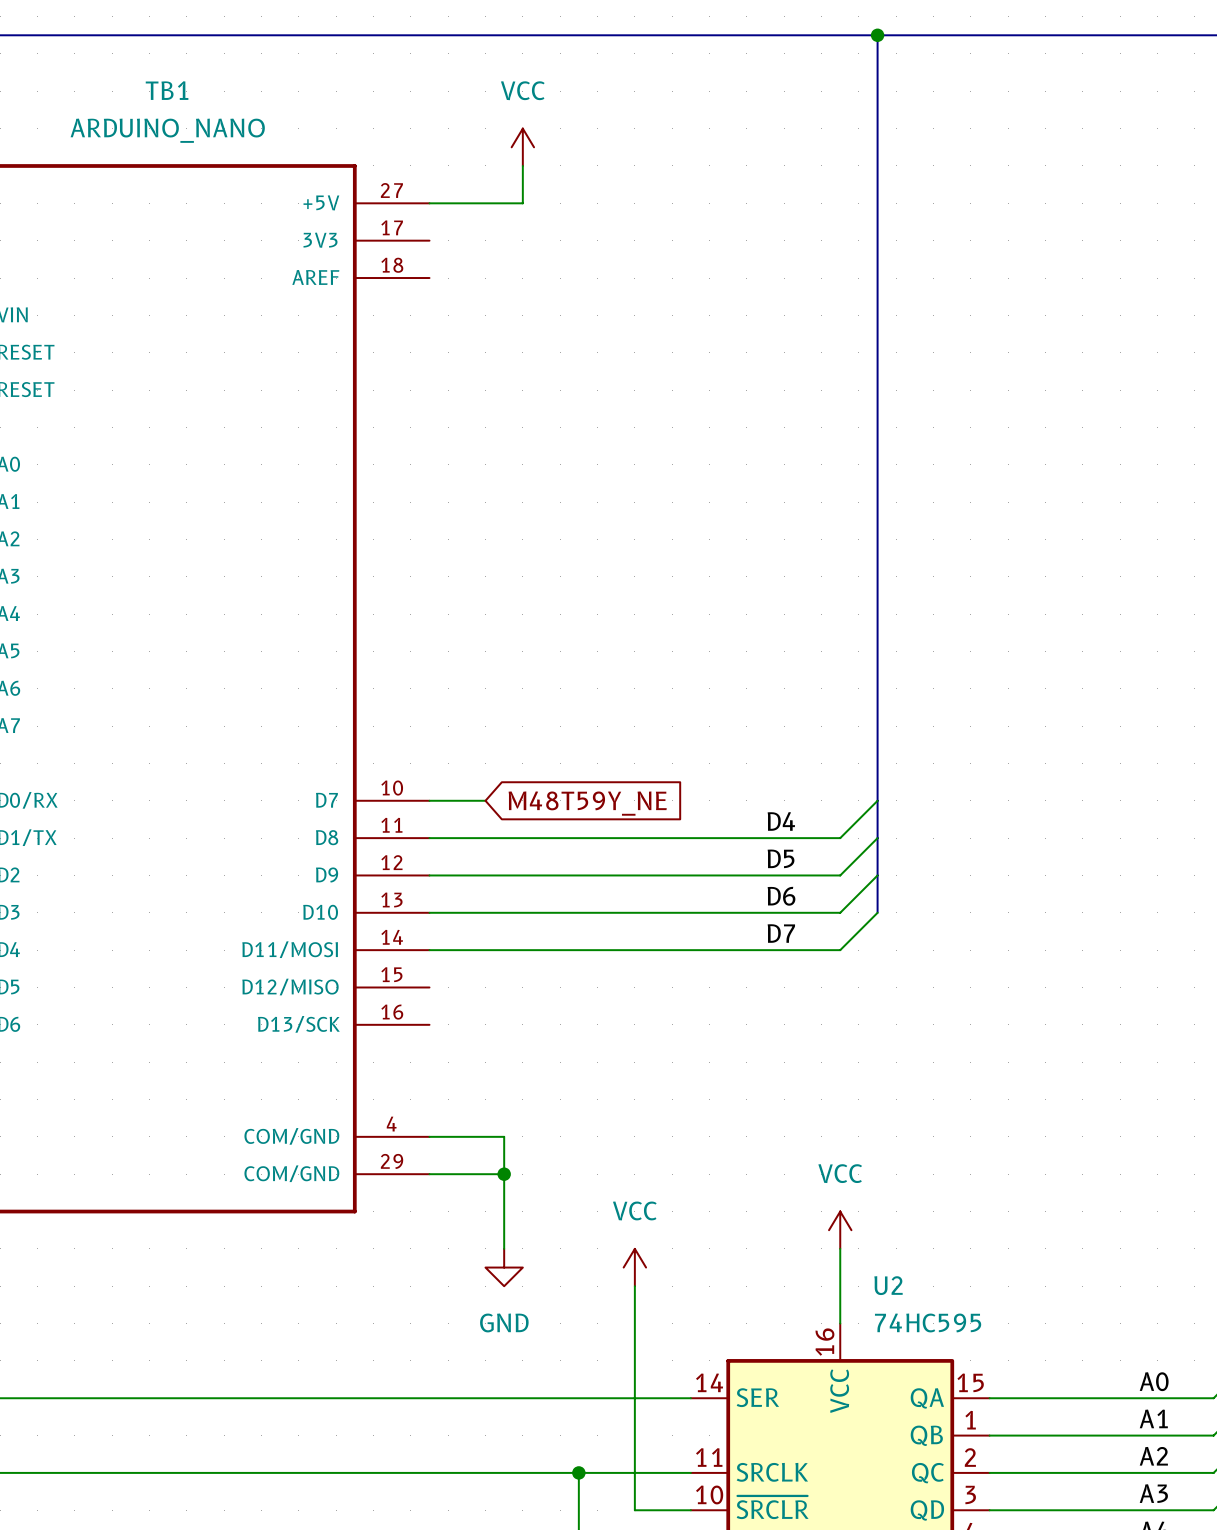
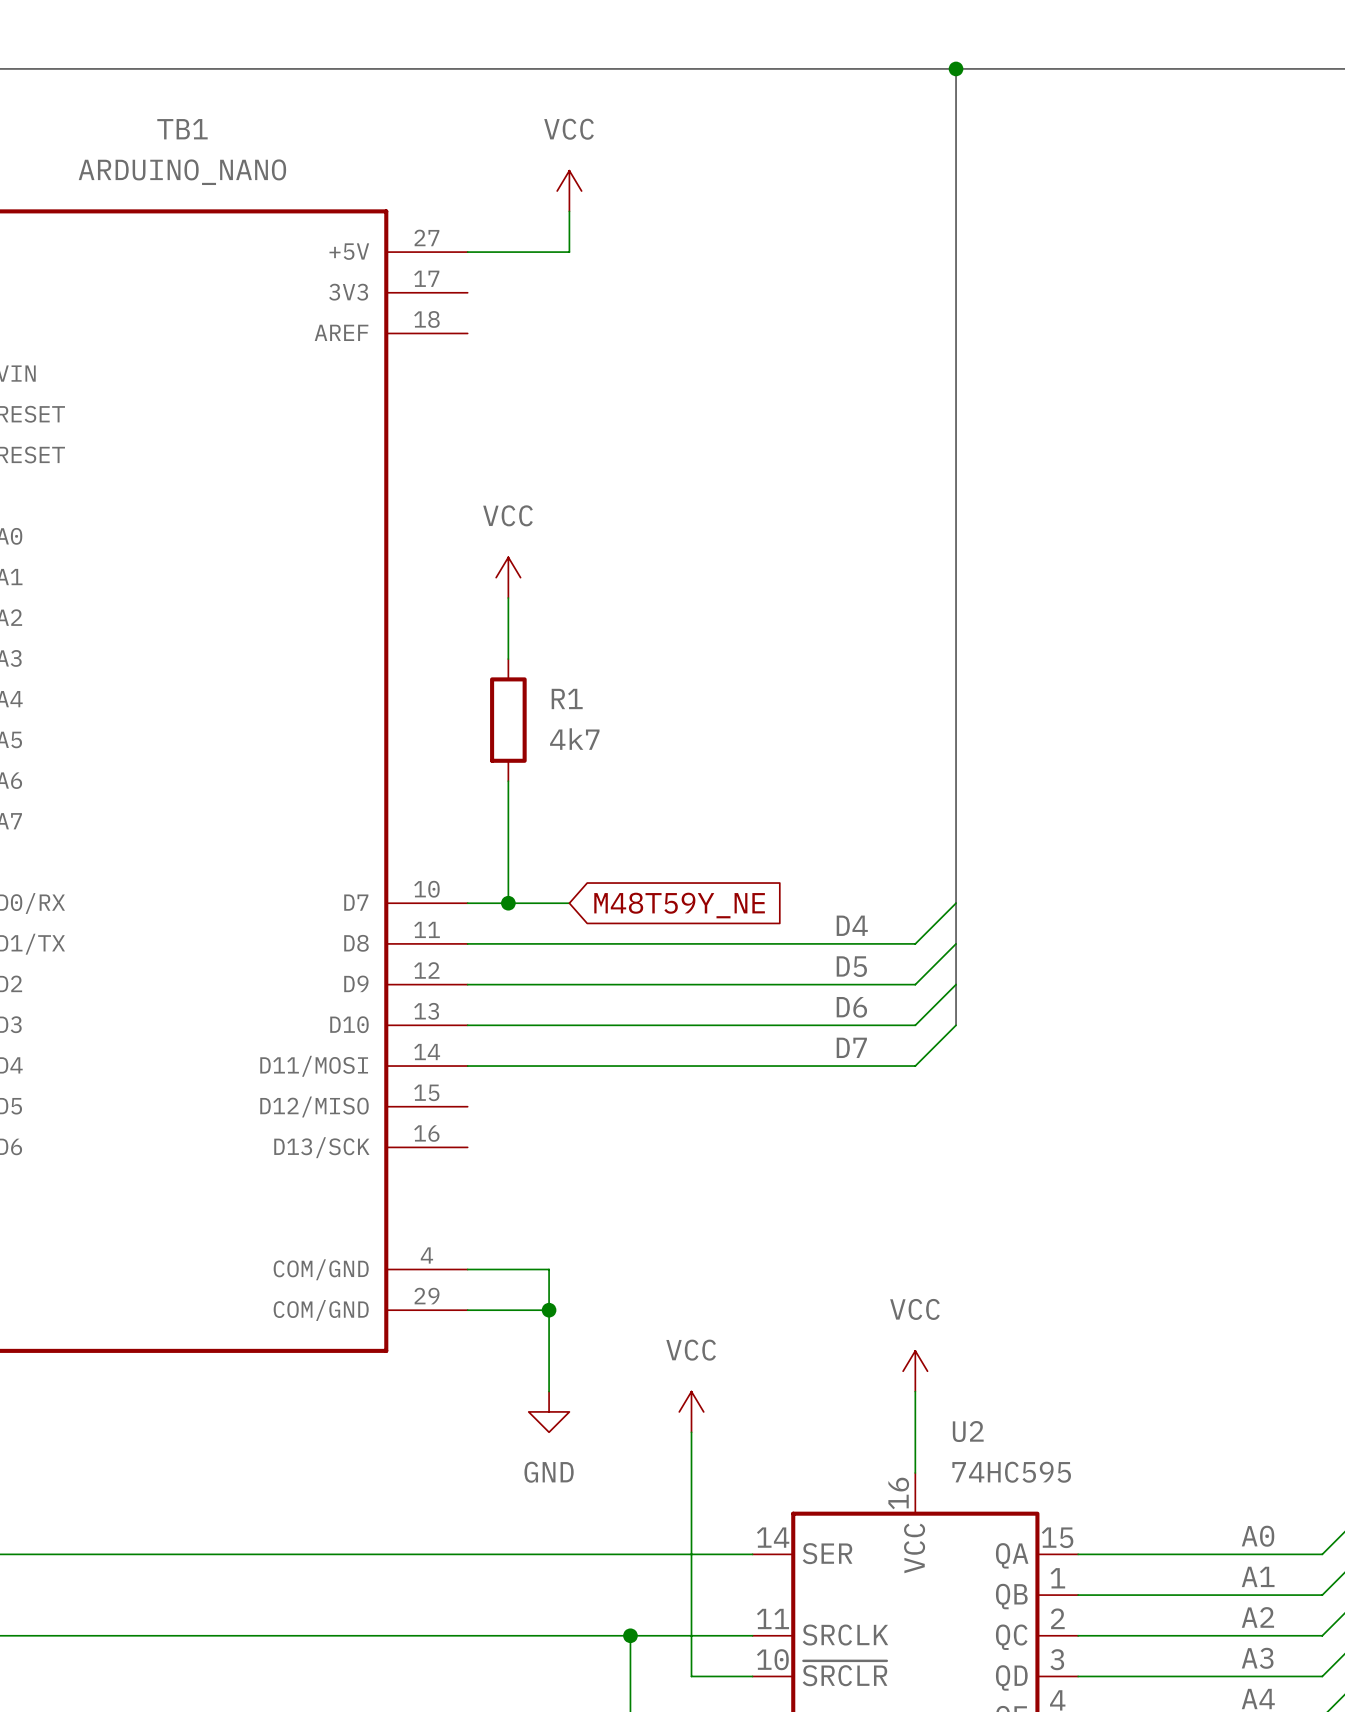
power symbol: none -> VCC (508, 577)
wire: none -> (508, 598) (508, 659)
R1: none -> 4k7 (508, 720)
wire: none -> (508, 781) (508, 903)
junction: none -> (508, 903)
wire: none -> (528, 903) (569, 903)
global label position: M48T59Y_NE (587, 803) -> M48T59Y_NE (679, 905)

